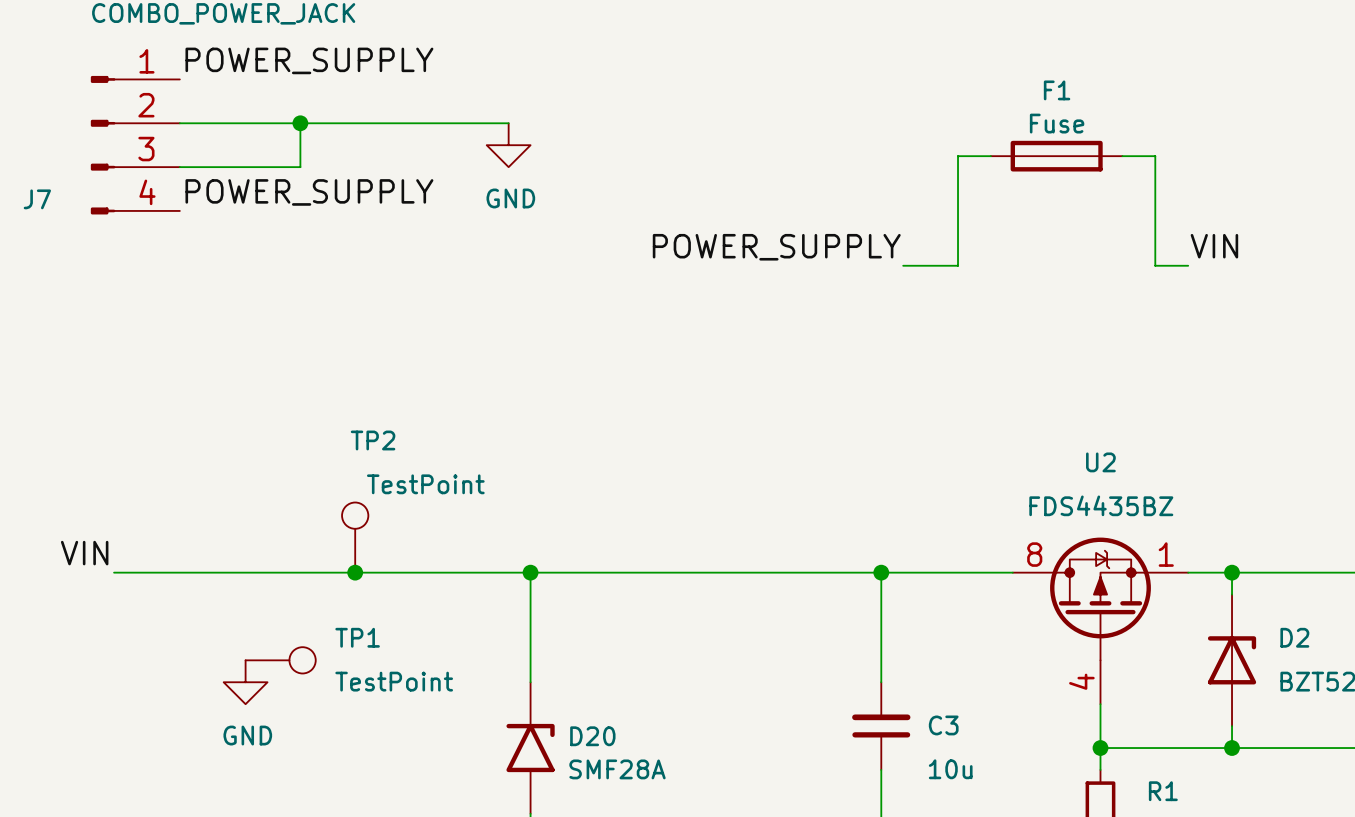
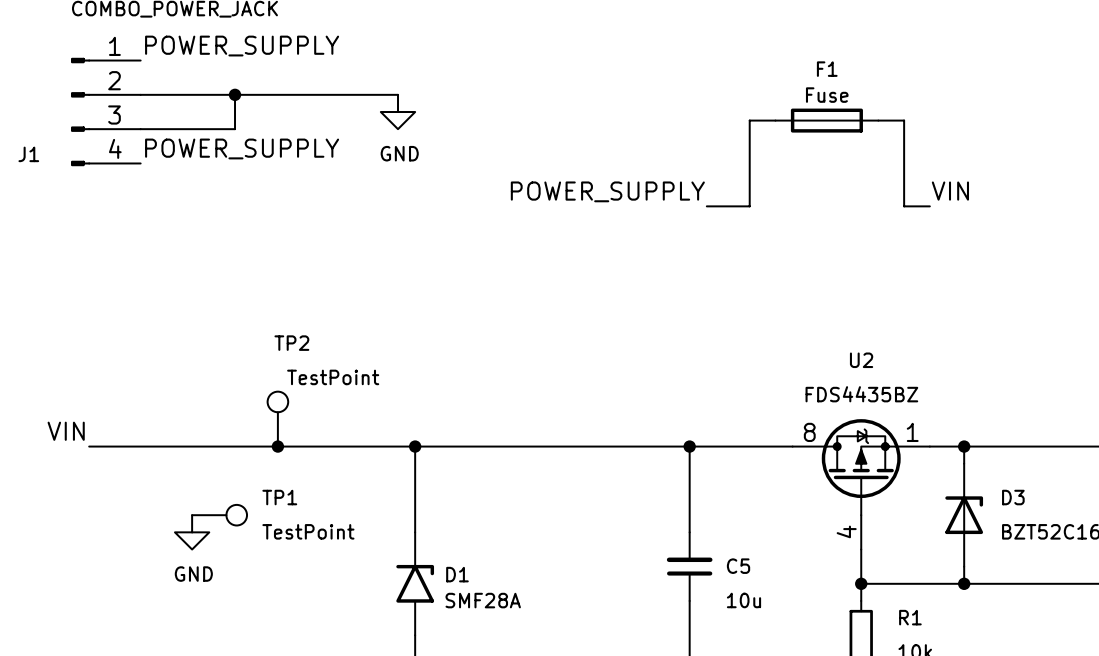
J7 name: J7 (37, 199) -> J1 (28, 154)
D2 name: D2 (1294, 637) -> D3 (1013, 497)
C3 name: C3 (943, 725) -> C5 (738, 566)
D20 name: D20 (592, 736) -> D1 (457, 574)

